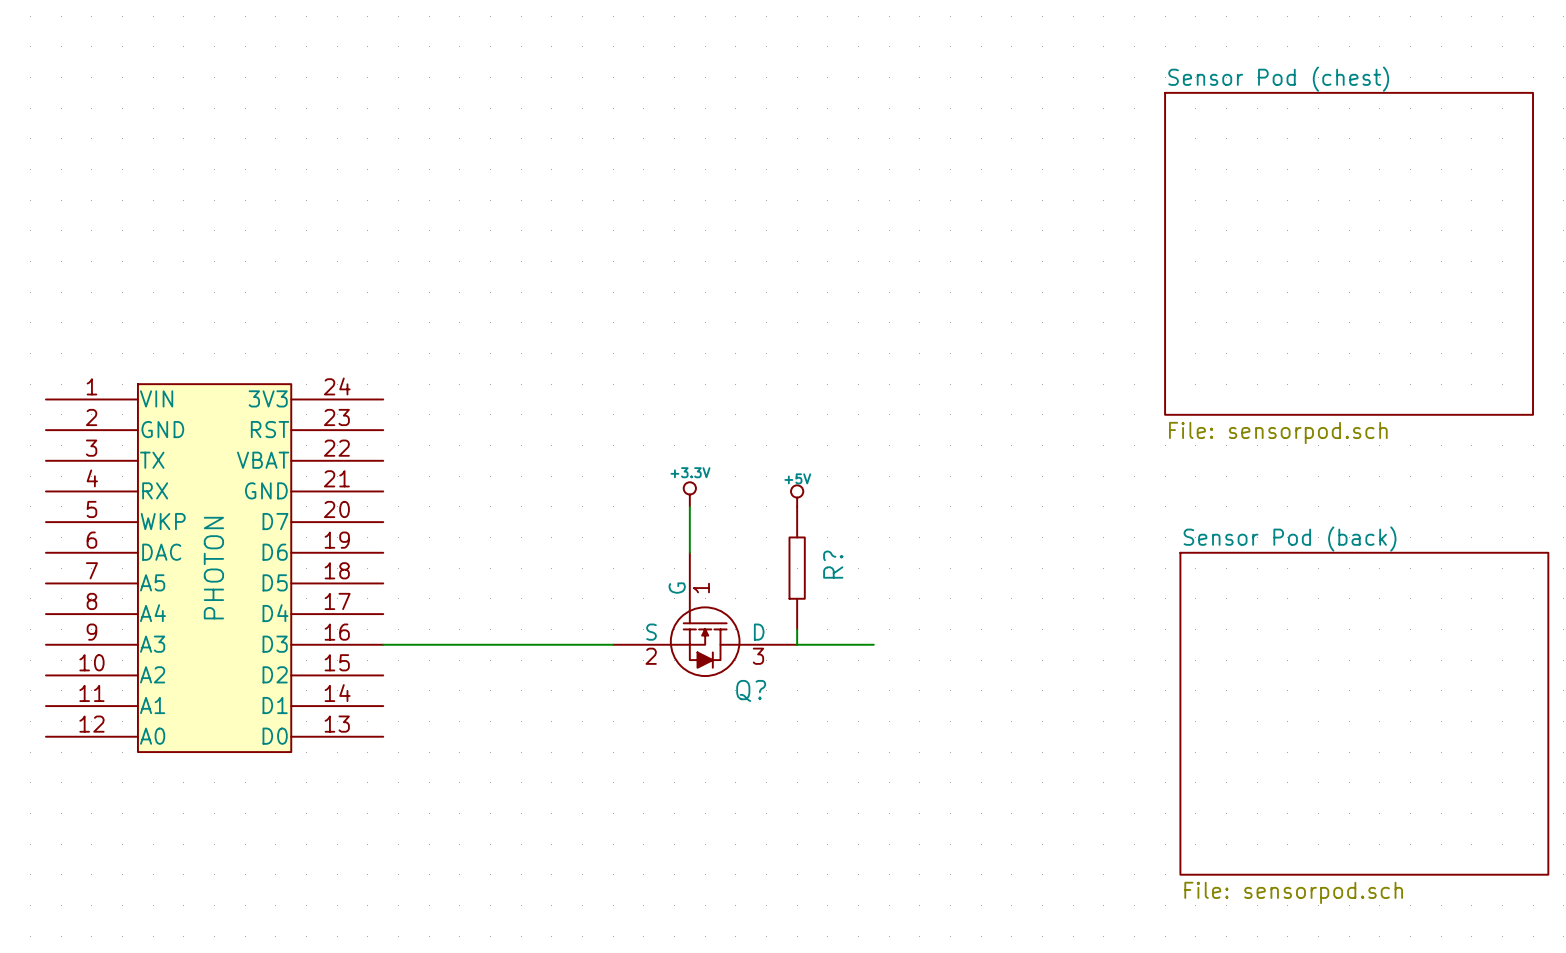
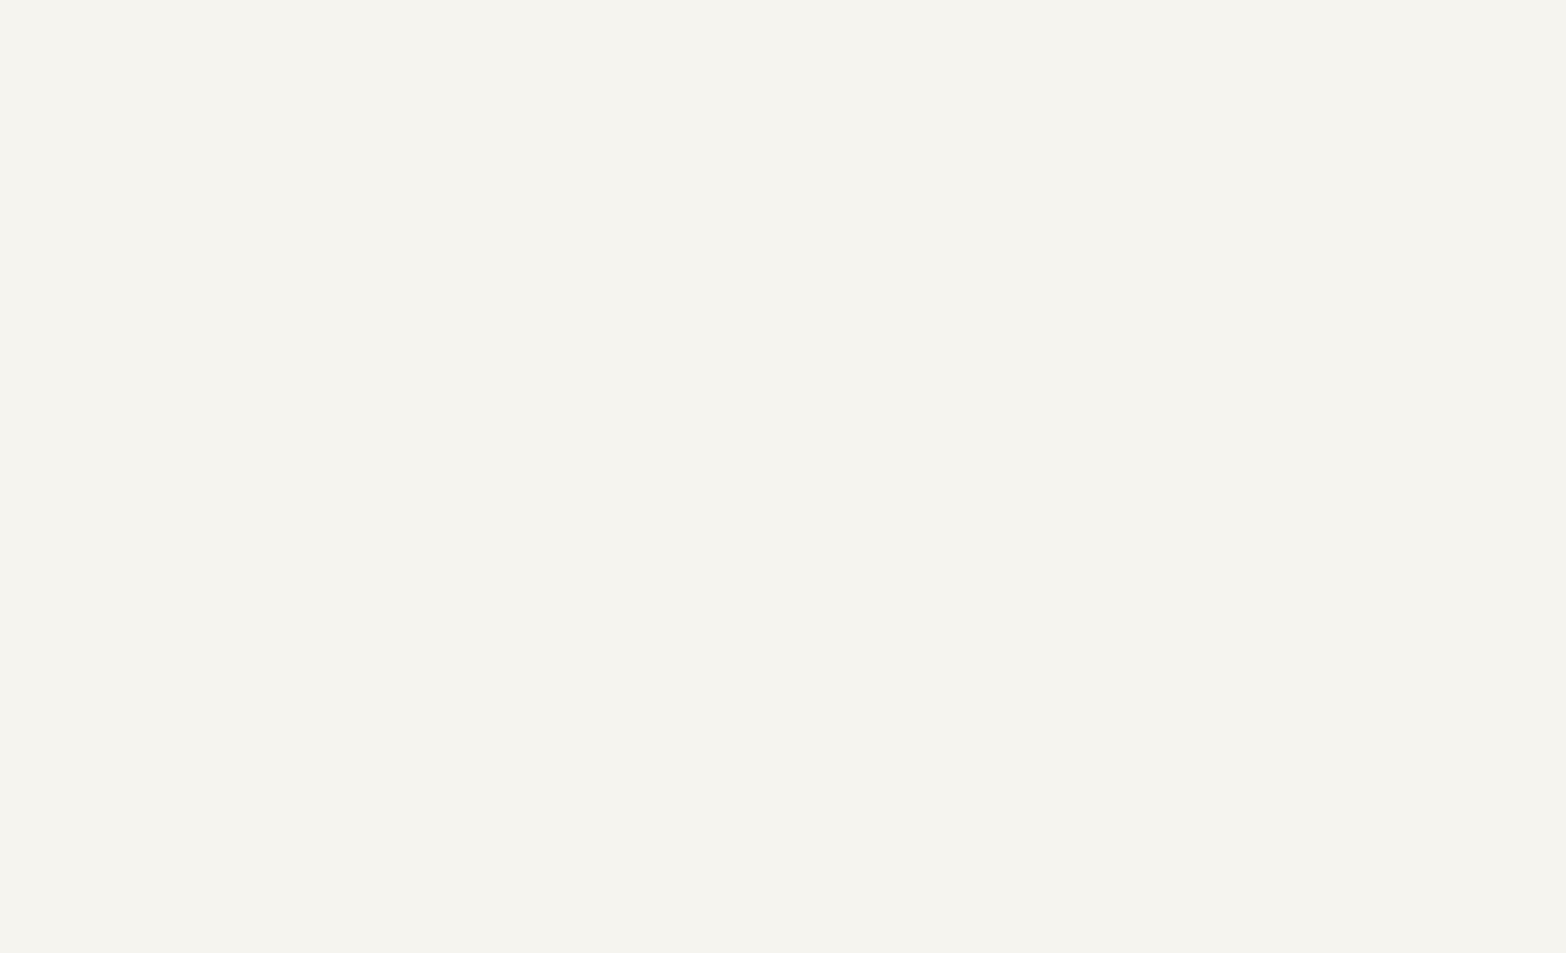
sheet Sensor Pod (chest): File: sensorpod.sch (1349, 253) -> none
power symbol: +3.3V (689, 494) -> none
power symbol: +5V (797, 496) -> none
wire: (689, 506) (689, 552) -> none
part: PHOTON (214, 568) -> none
R?: (797, 568) -> none
Q?: (705, 614) -> none
wire: (797, 629) (797, 644) (873, 644) -> none
wire: (383, 644) (613, 644) -> none
sheet Sensor Pod (back): File: sensorpod.sch (1364, 713) -> none

